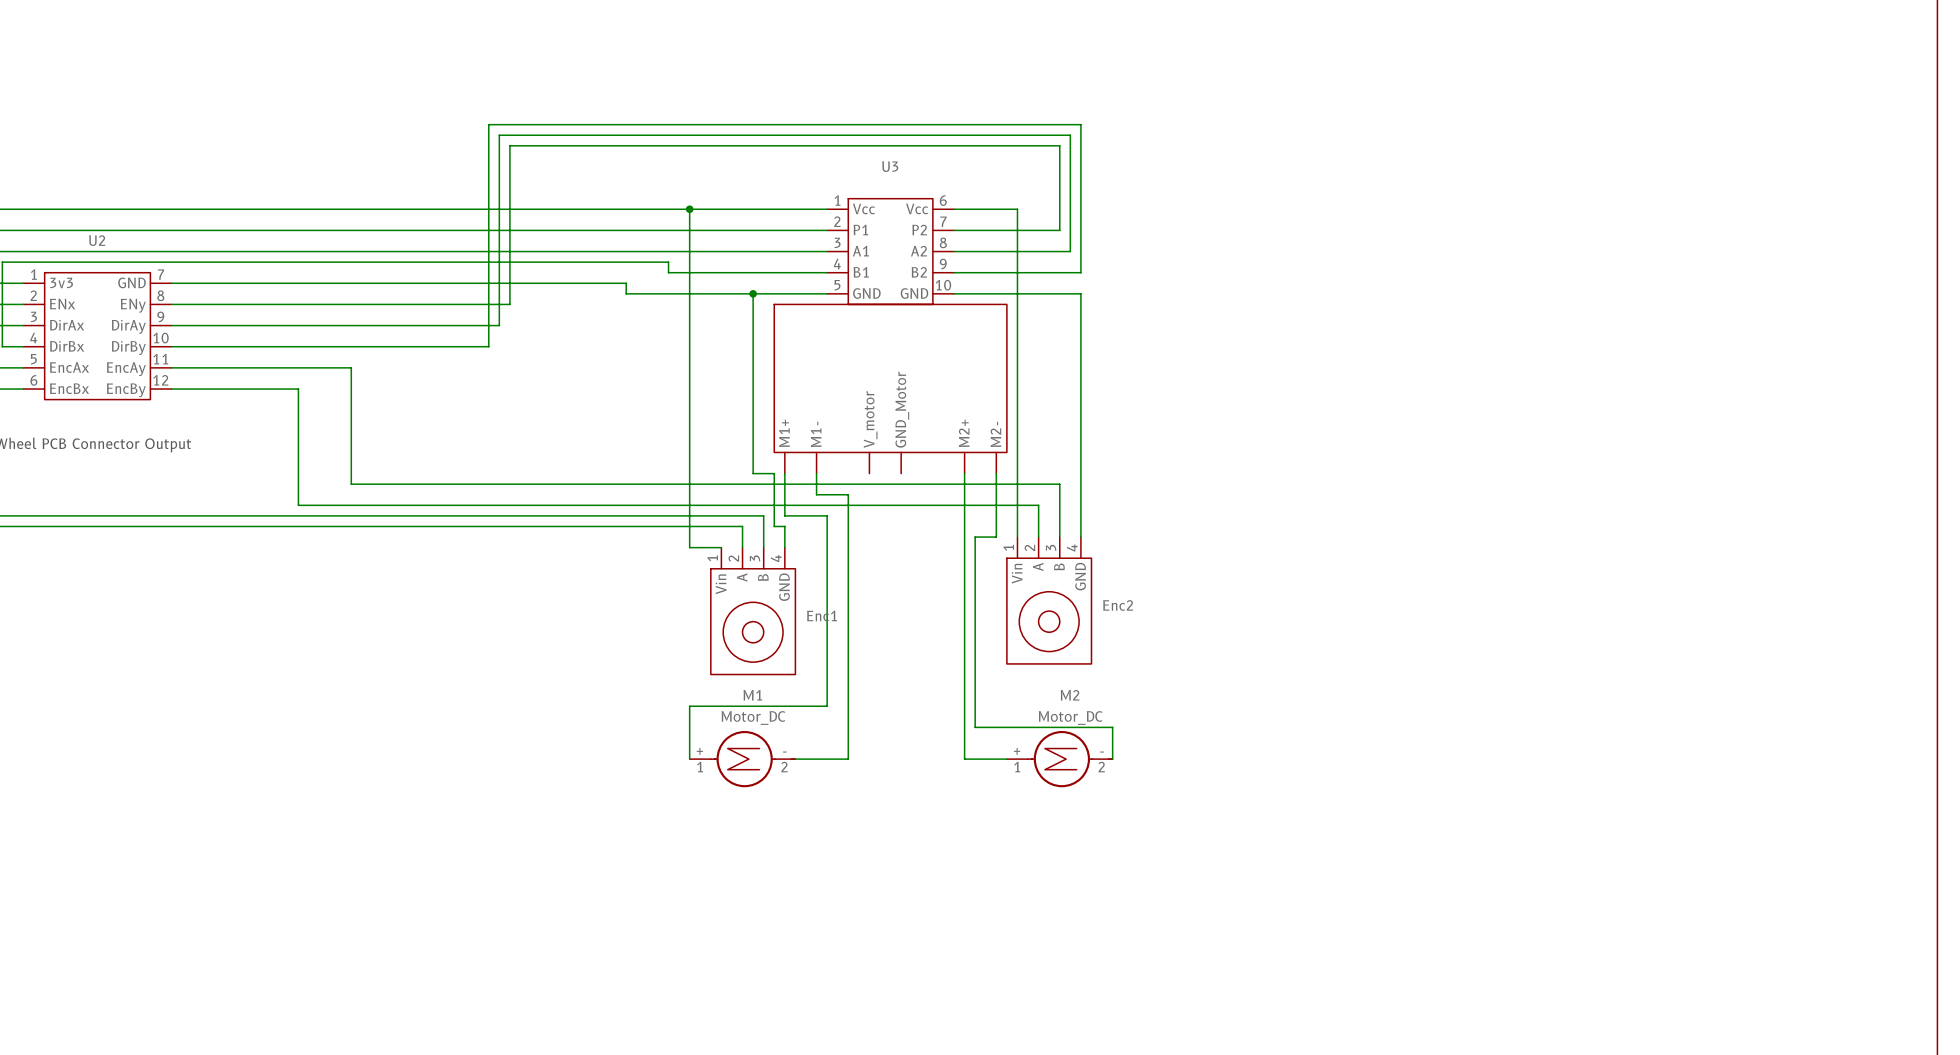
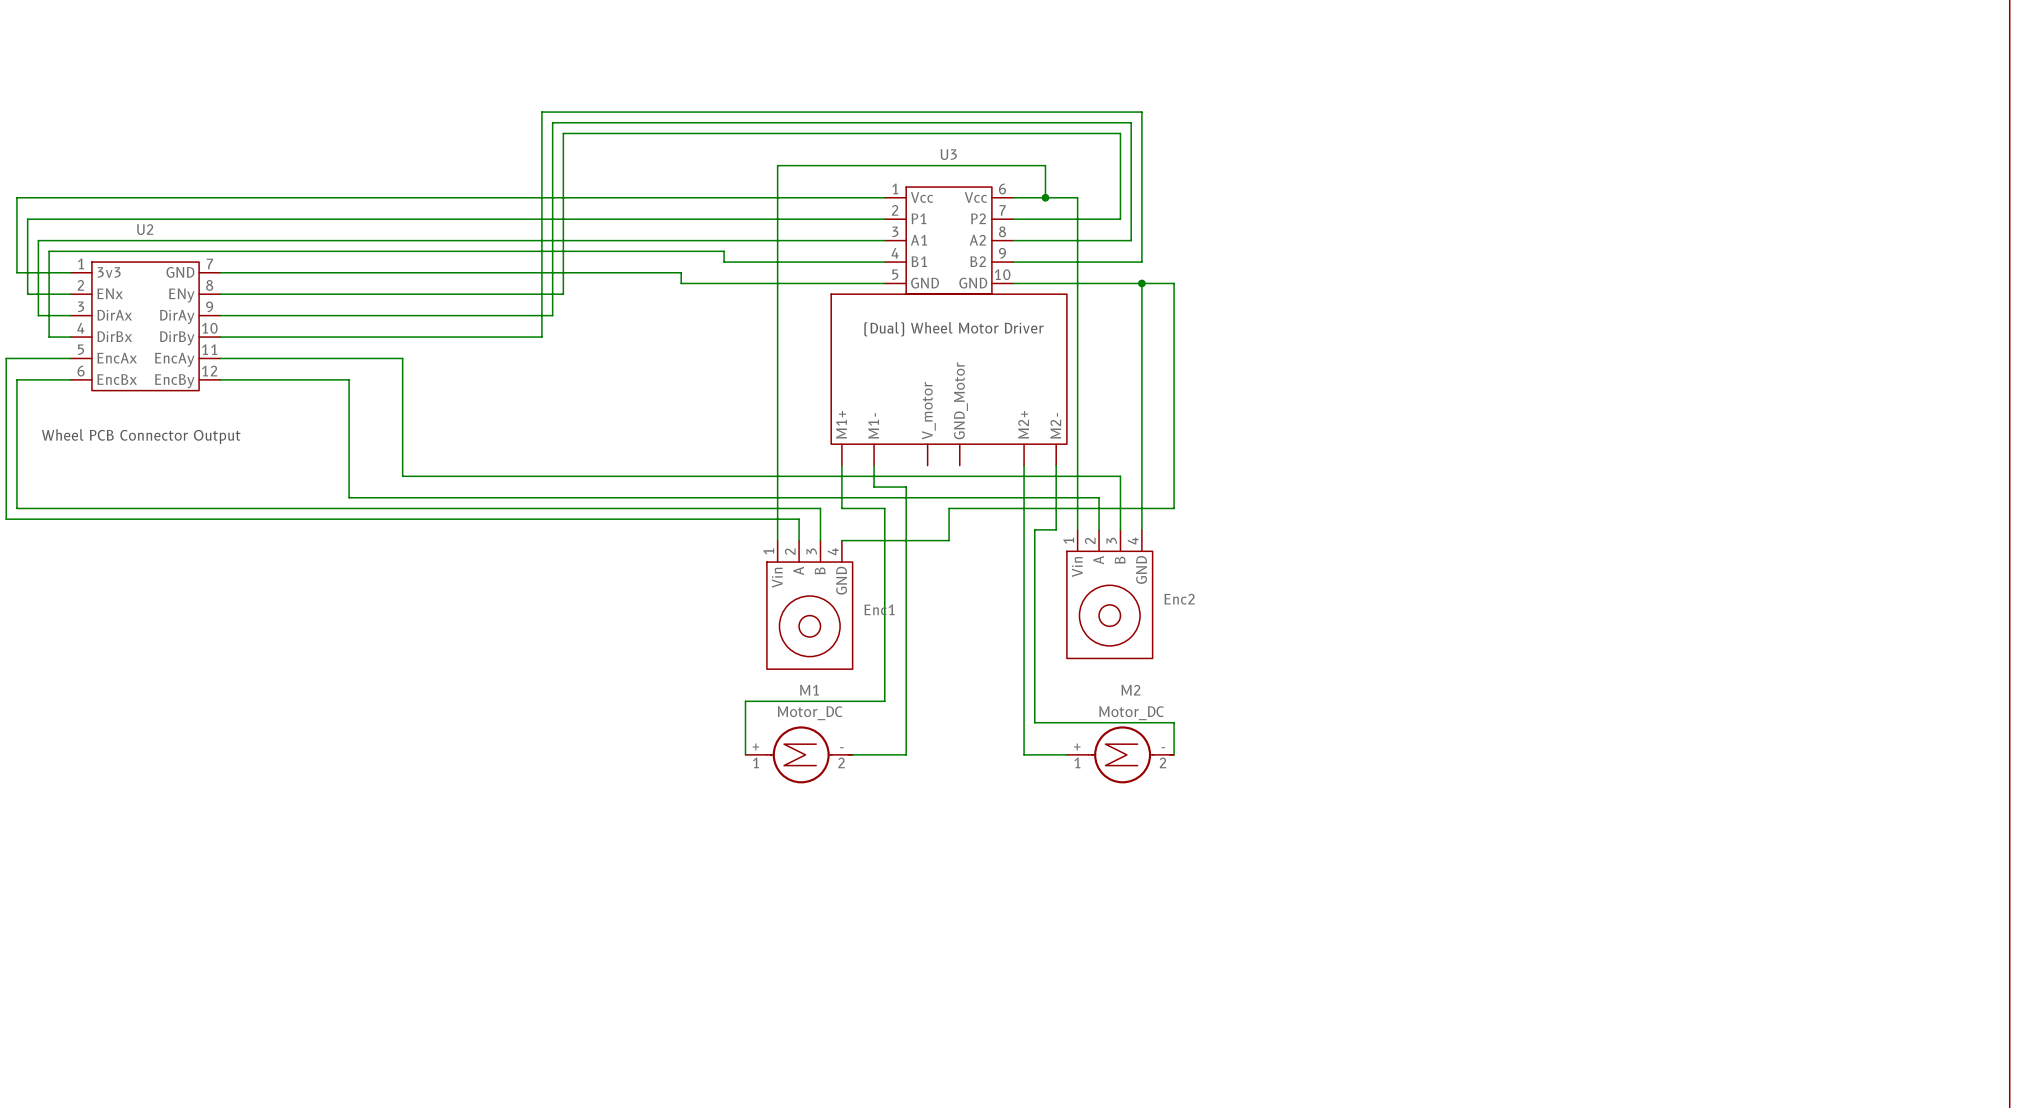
wire: (689, 209) (689, 547) (721, 547) -> (1045, 197) (1045, 165) (777, 165) (777, 540)
junction: (689, 209) -> none
junction: none -> (1045, 197)
wire: (753, 293) (753, 473) (774, 473) (774, 526) (784, 526) (784, 547) -> (1141, 283) (1174, 283) (1174, 508) (949, 508) (949, 540) (841, 540)
junction: (753, 293) -> none
junction: none -> (1141, 283)
text: none -> (Dual) Wheel Motor Driver (954, 329)

